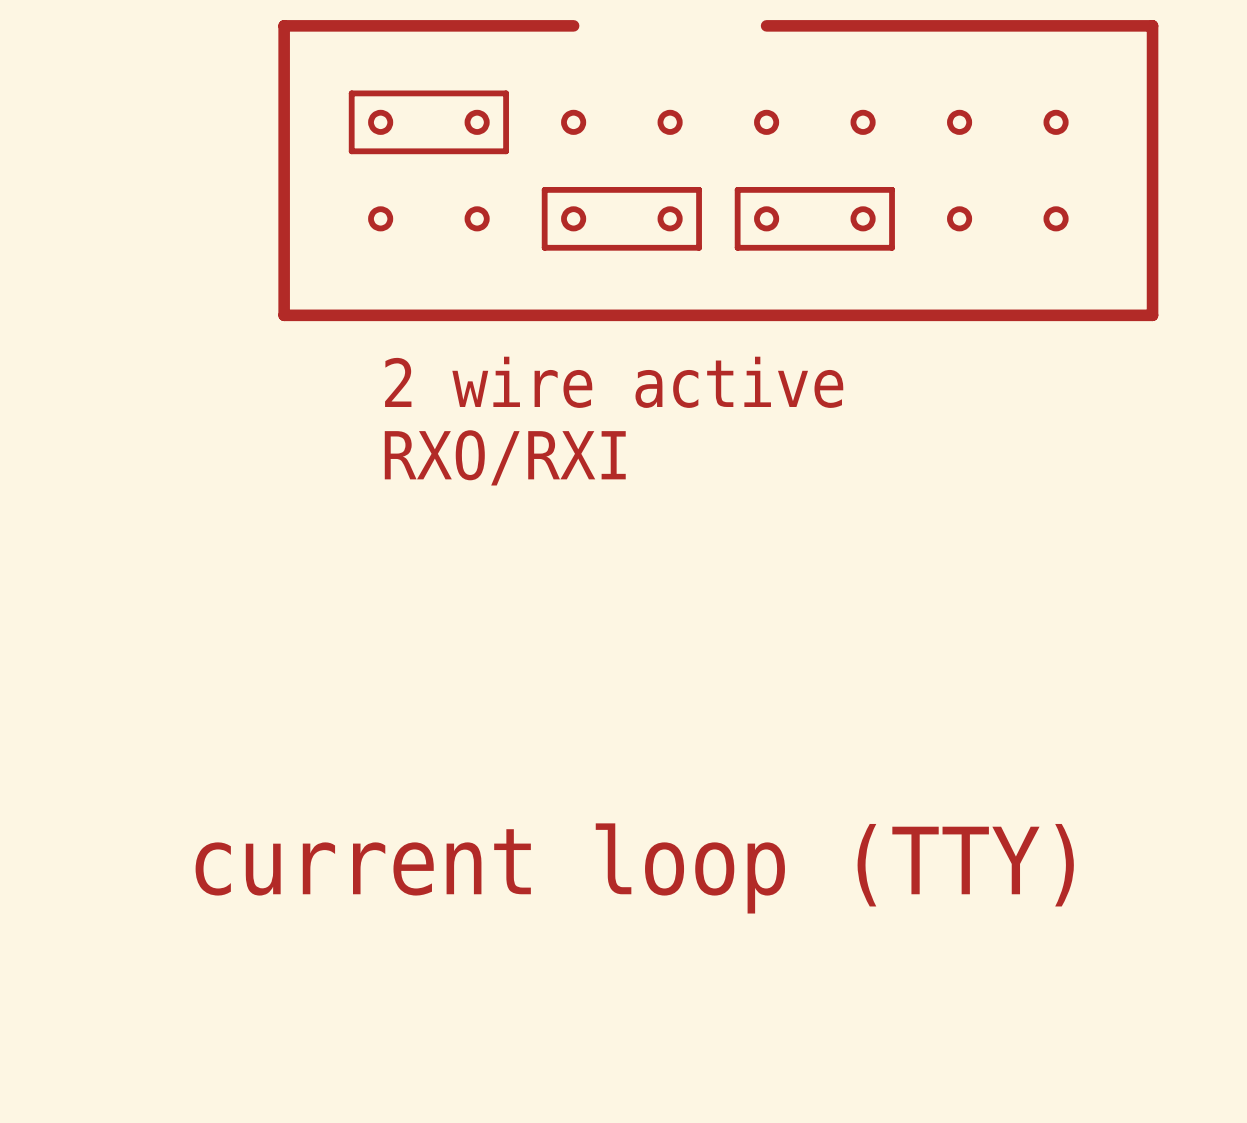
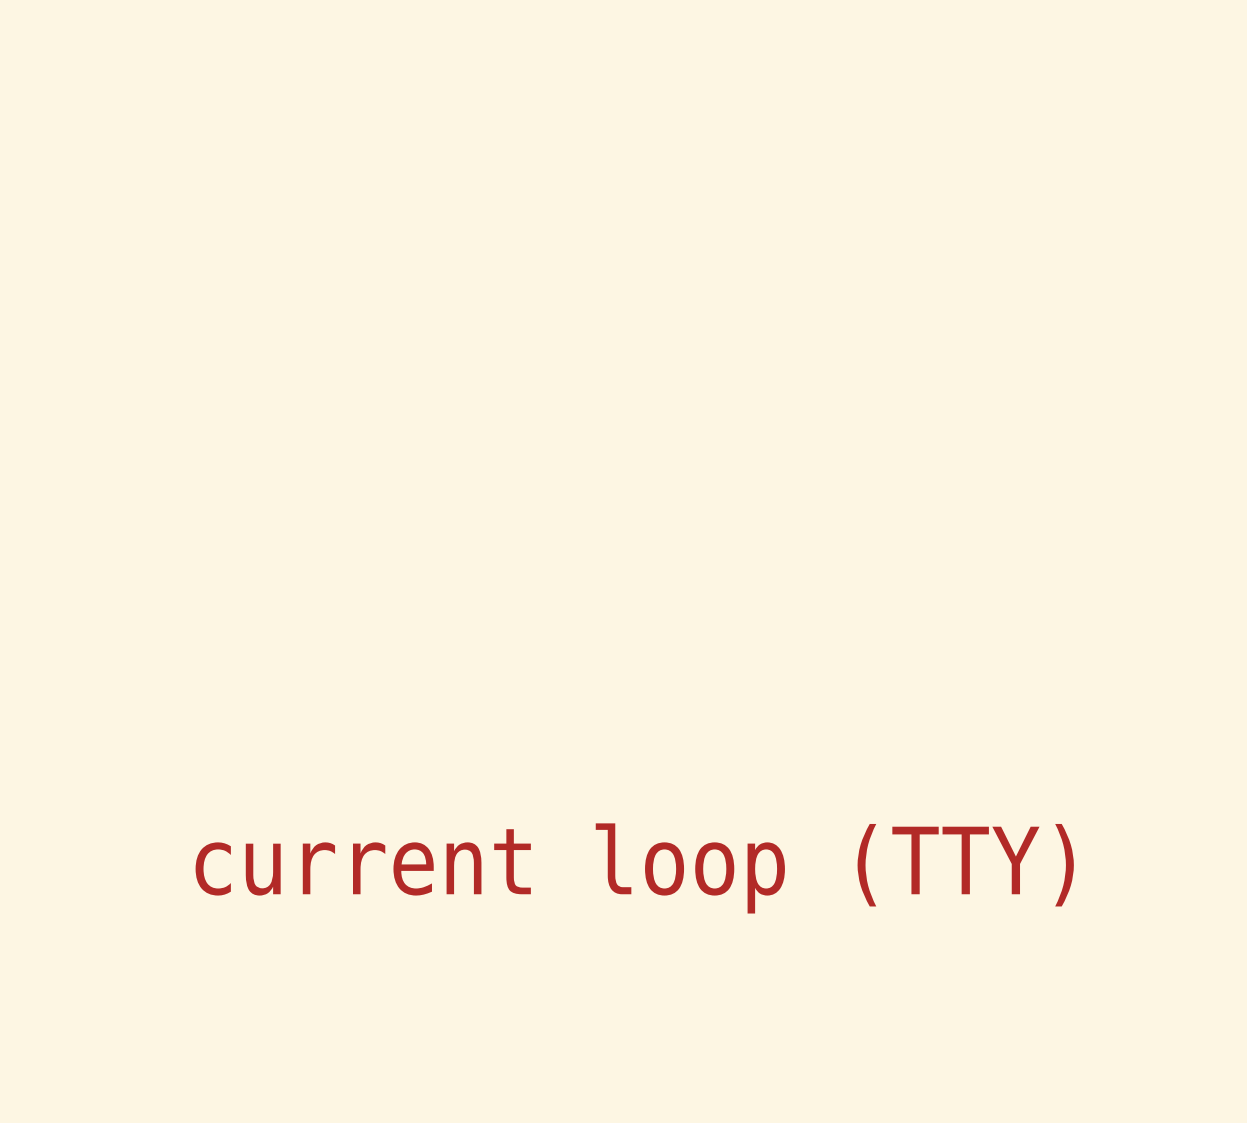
line: (573, 25) (284, 25) (284, 315) (1152, 315) (1152, 25) (766, 25) -> none
line: (351, 93) (506, 93) (506, 151) (351, 151) (351, 93) -> none
drawing: [368, 109, 394, 135] -> none
drawing: [464, 109, 490, 135] -> none
drawing: [561, 109, 587, 135] -> none
drawing: [657, 109, 683, 135] -> none
drawing: [754, 109, 780, 135] -> none
drawing: [850, 109, 876, 135] -> none
drawing: [947, 109, 973, 135] -> none
drawing: [1043, 109, 1069, 135] -> none
line: (544, 189) (699, 189) (699, 247) (544, 247) (544, 189) -> none
line: (737, 189) (892, 189) (892, 247) (737, 247) (737, 189) -> none
drawing: [368, 206, 394, 232] -> none
drawing: [464, 206, 490, 232] -> none
drawing: [561, 206, 587, 232] -> none
drawing: [657, 206, 683, 232] -> none
drawing: [754, 206, 780, 232] -> none
drawing: [850, 206, 876, 232] -> none
drawing: [947, 206, 973, 232] -> none
drawing: [1043, 206, 1069, 232] -> none
text: 2 wire active (614, 382) -> none
text: RXO/RXI (505, 457) -> none

